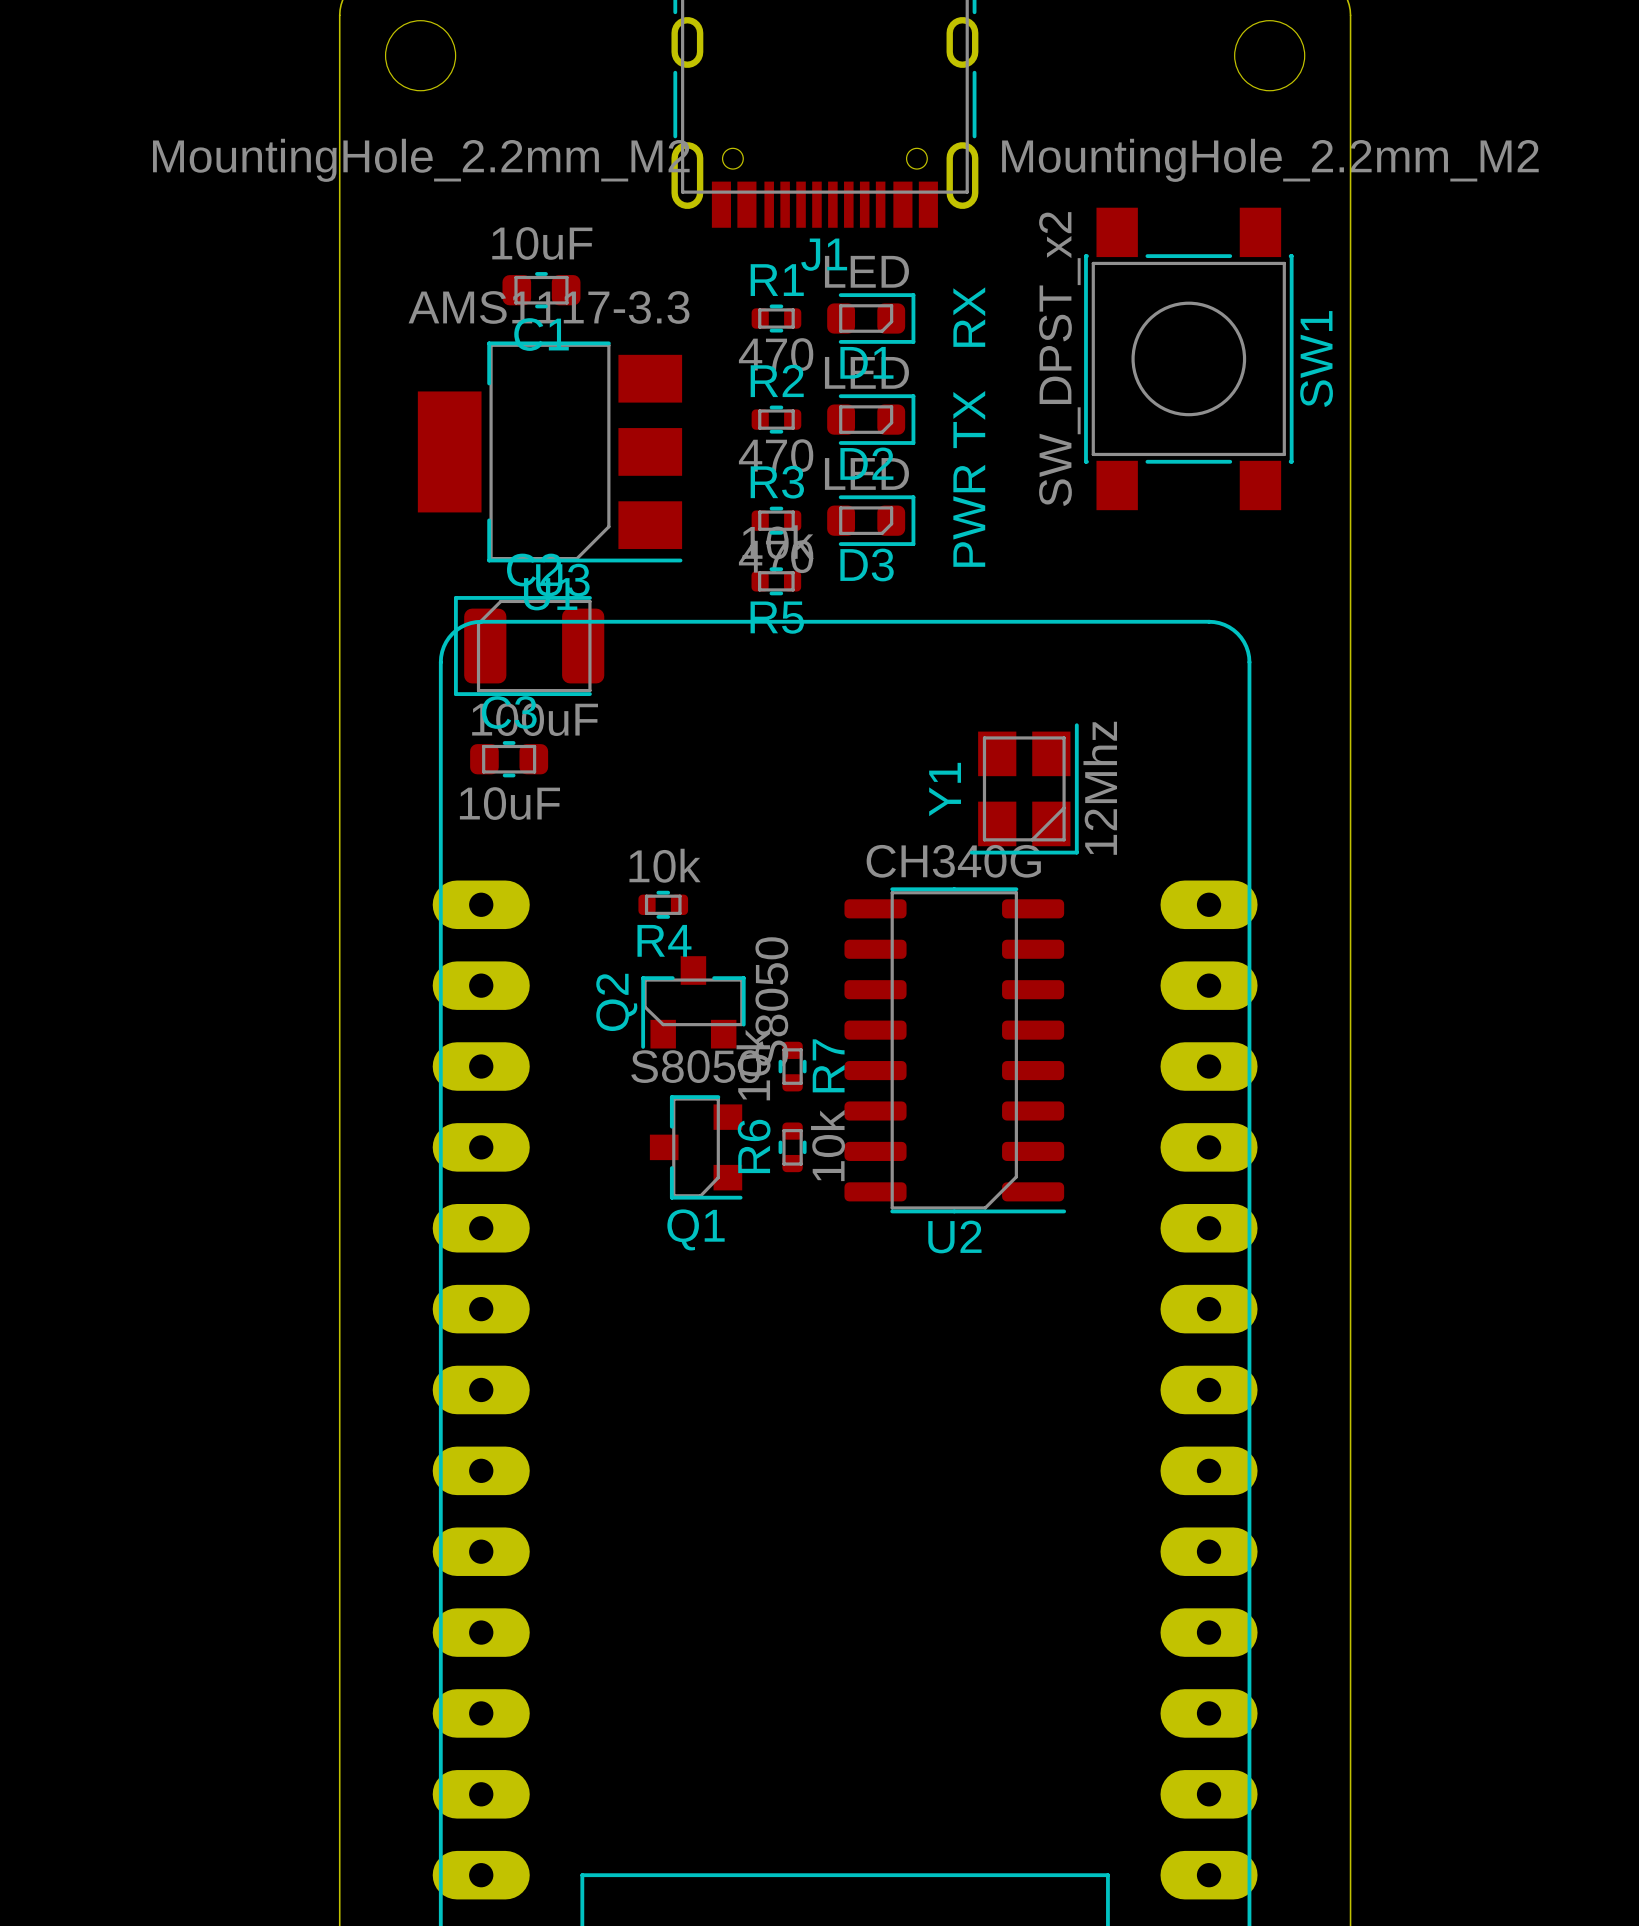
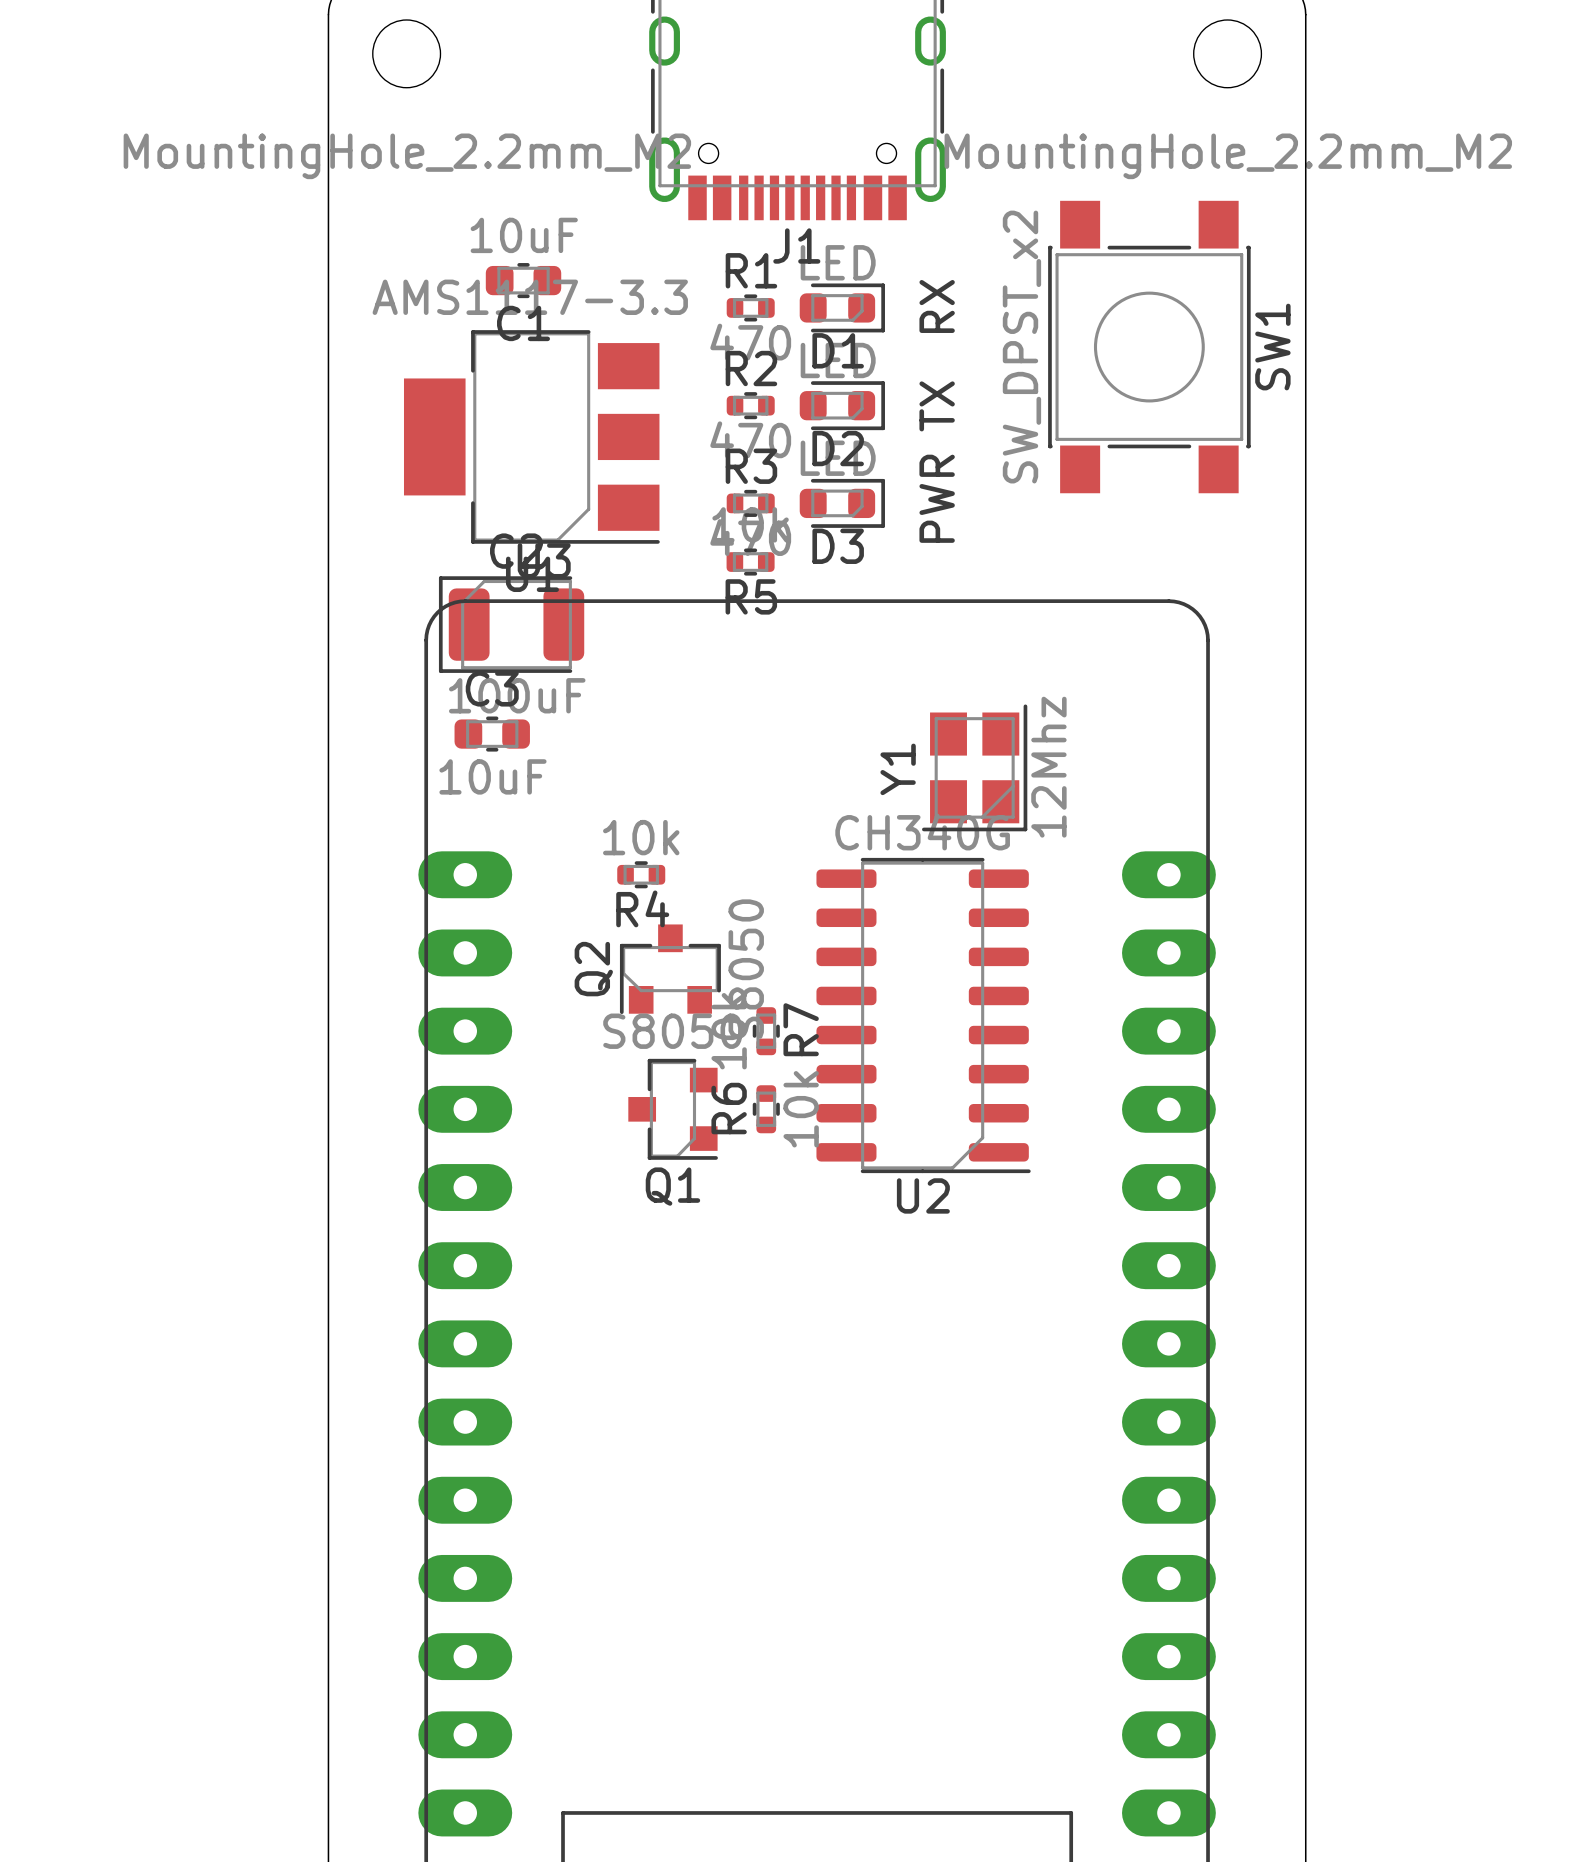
Y1 position: (1024, 788) -> (974, 767)

